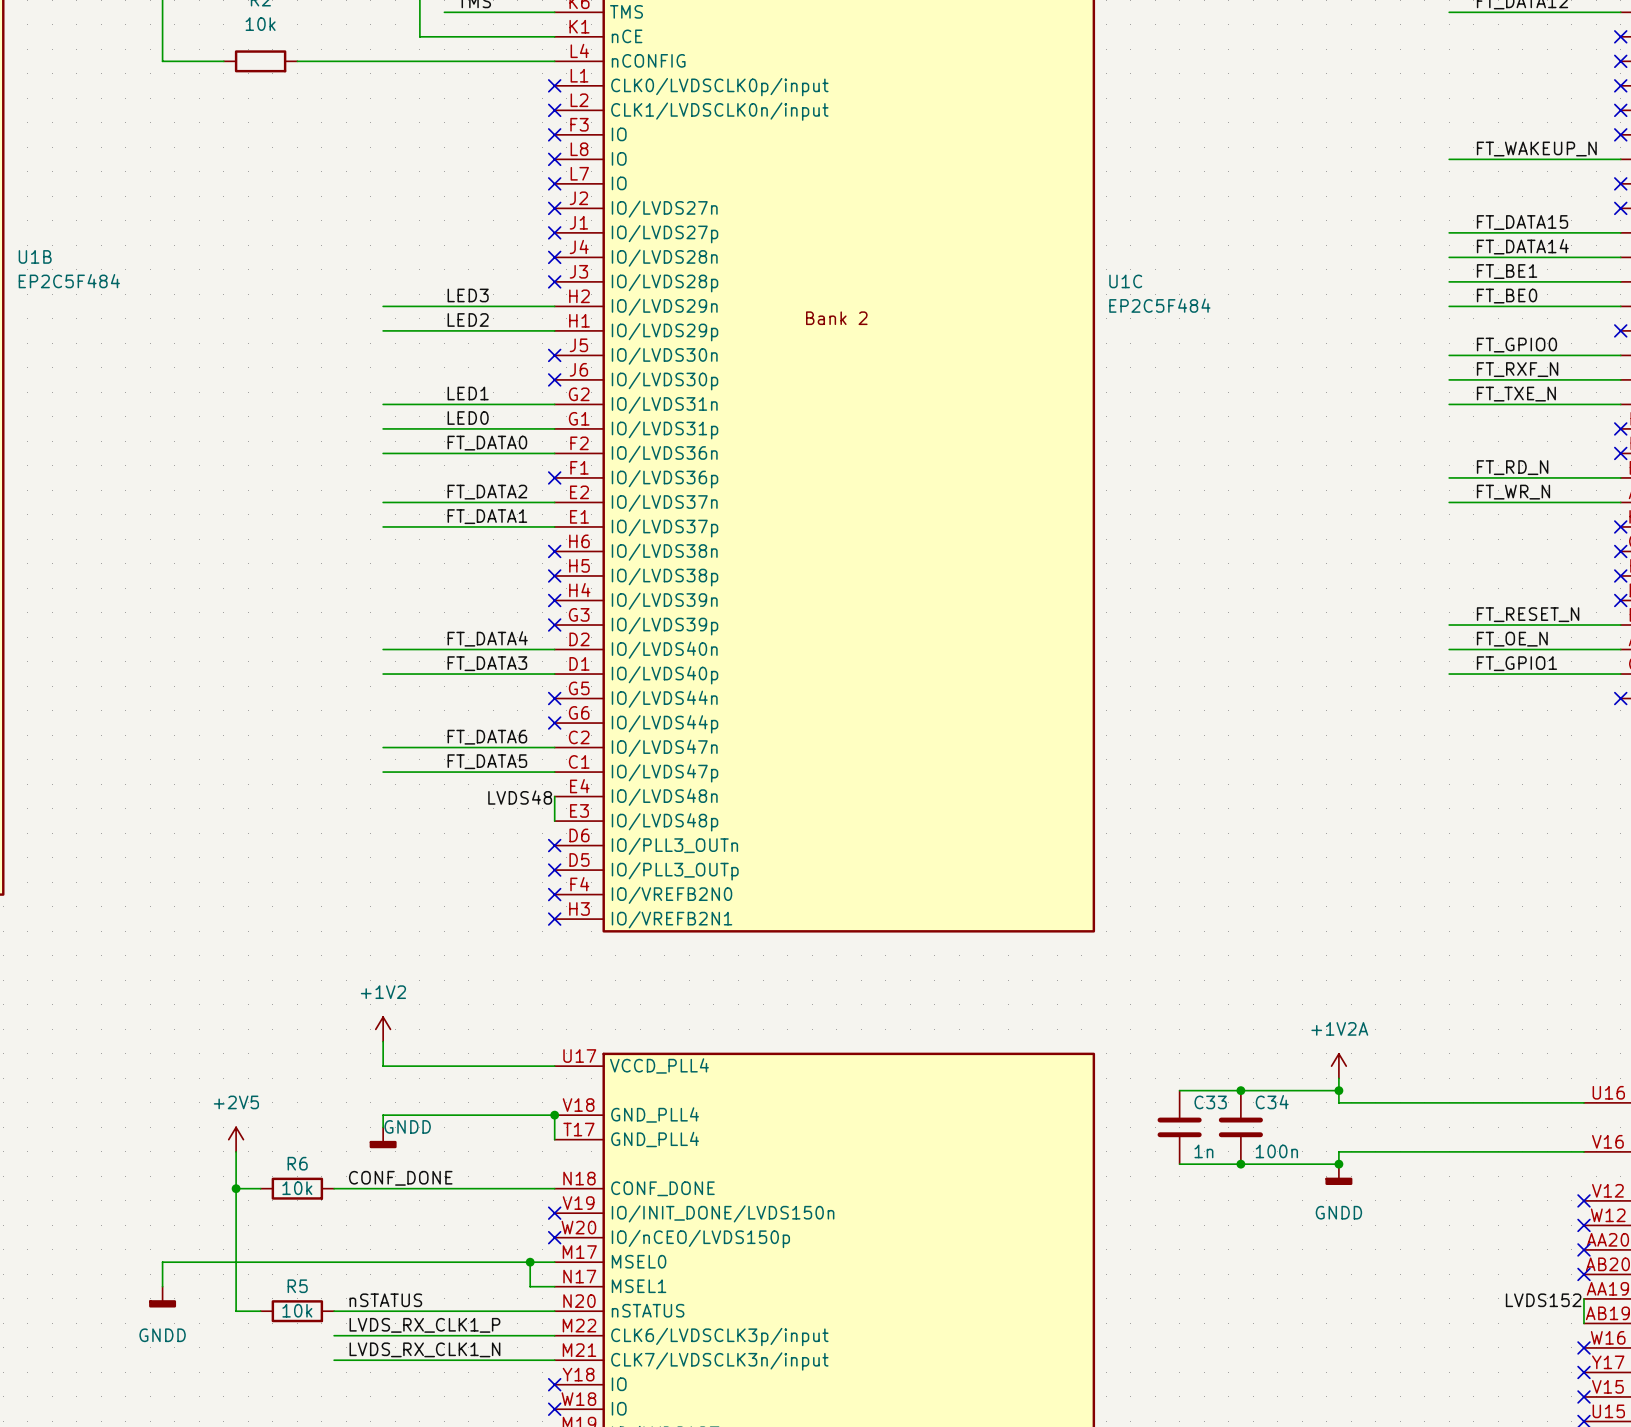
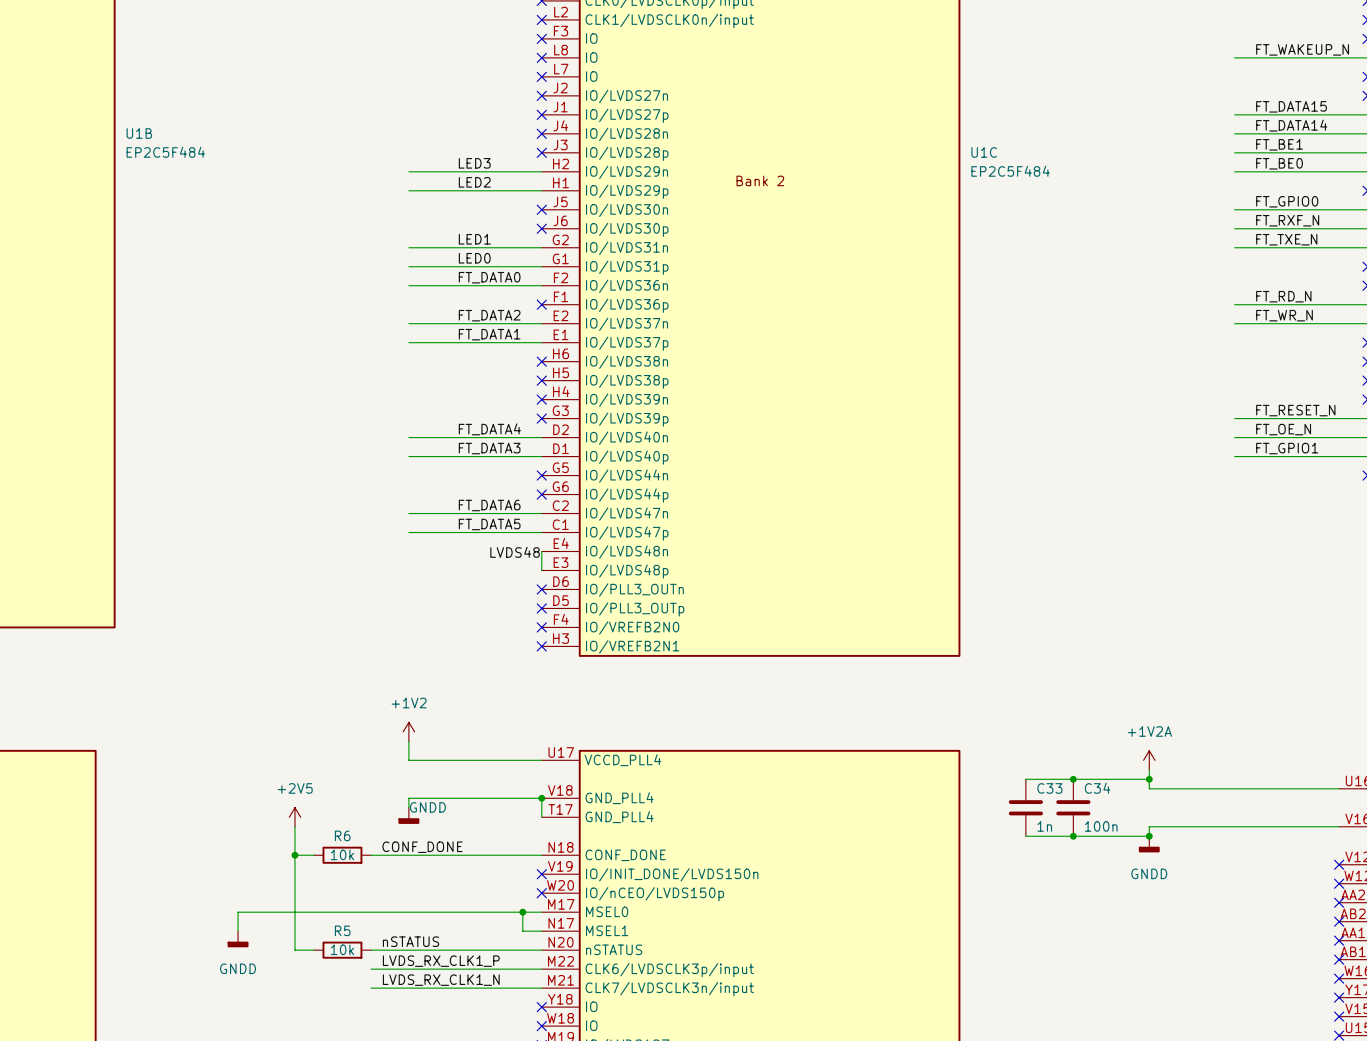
wire: (1583, 1298) (1583, 1323) -> none
no-connect mark: none -> (1339, 940)
label: LVDS152 (1543, 1300) -> none
no-connect mark: none -> (1339, 959)

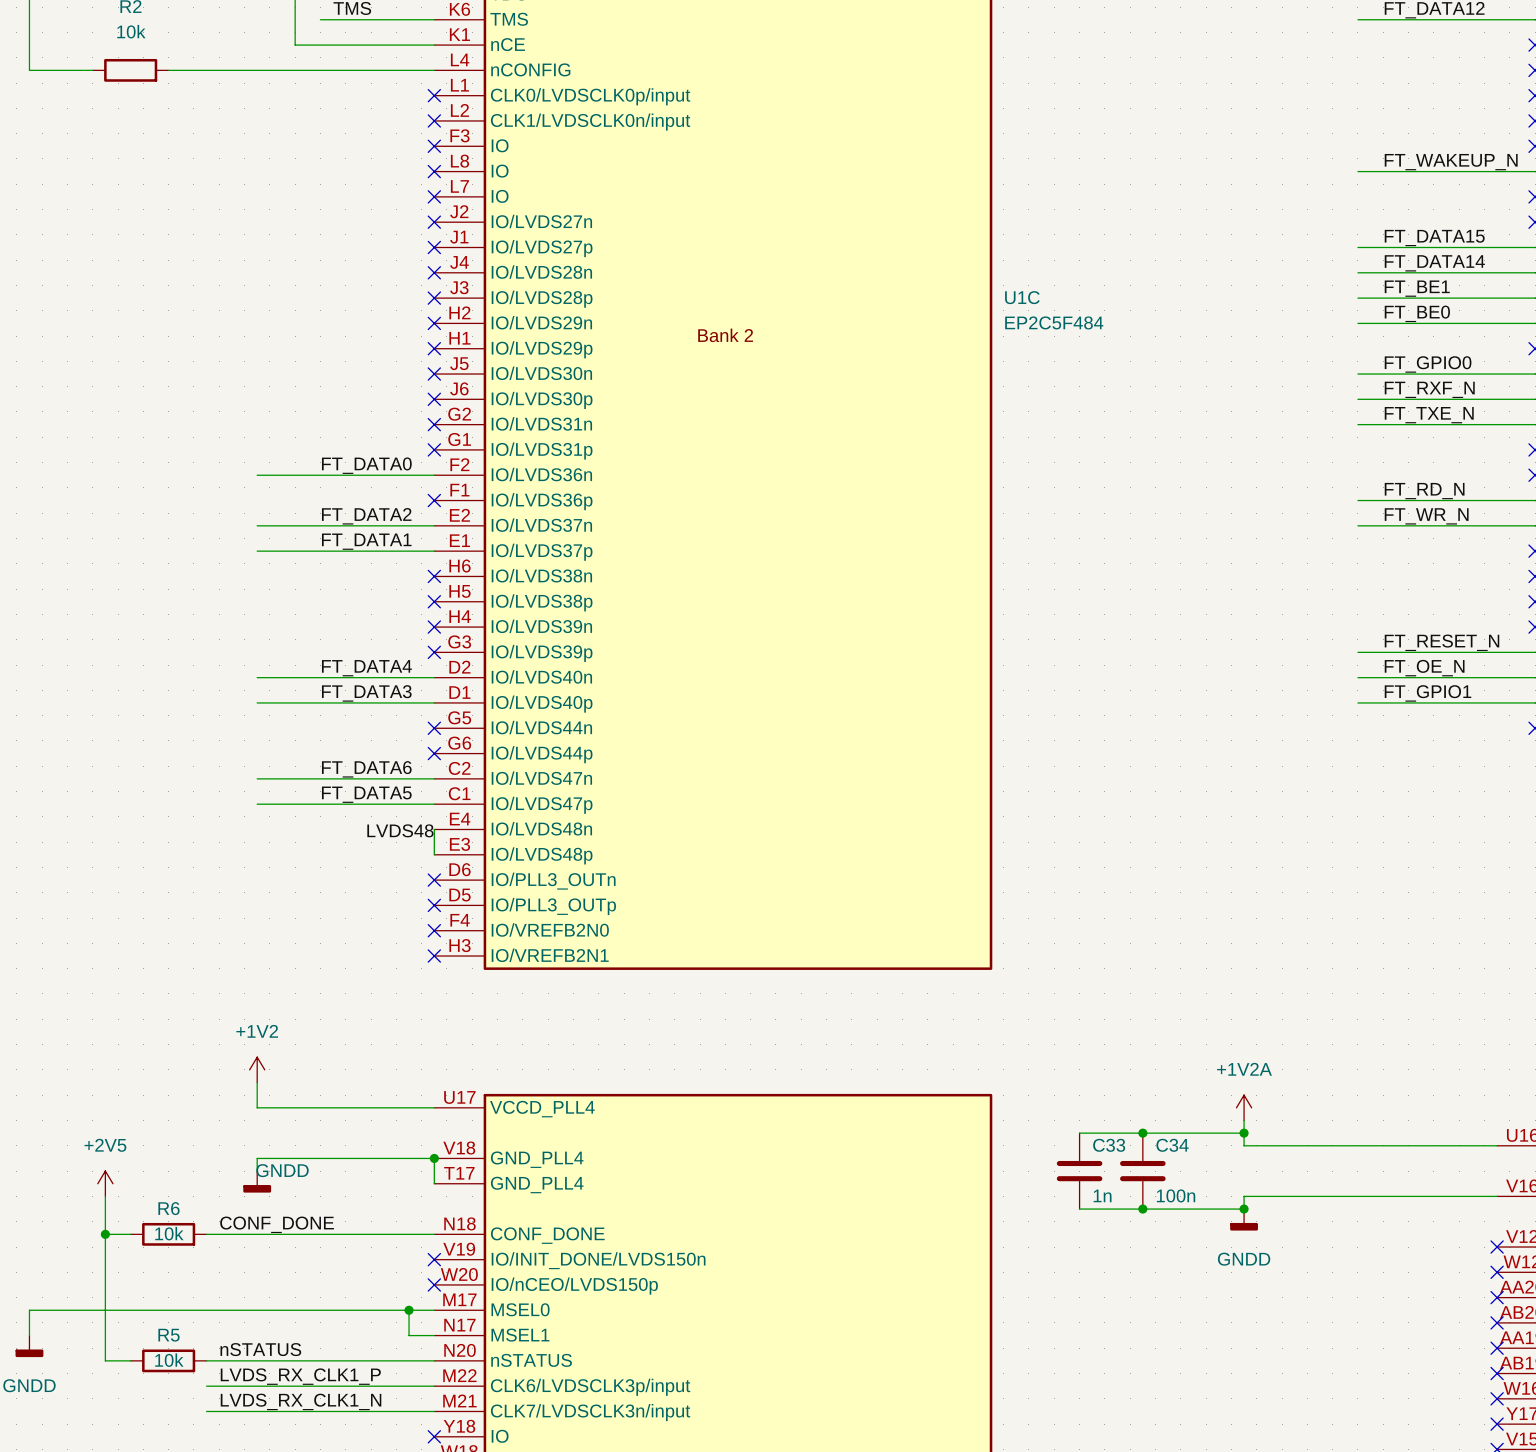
label: LED3 (474, 163) -> none
wire: (408, 171) (541, 171) -> none
no-connect mark: none -> (434, 323)
label: LED2 (474, 182) -> none
wire: (408, 190) (541, 190) -> none
no-connect mark: none -> (434, 348)
label: LED1 (474, 239) -> none
wire: (408, 247) (541, 247) -> none
no-connect mark: none -> (434, 424)
label: LED0 (474, 258) -> none
wire: (408, 266) (541, 266) -> none
no-connect mark: none -> (434, 449)

